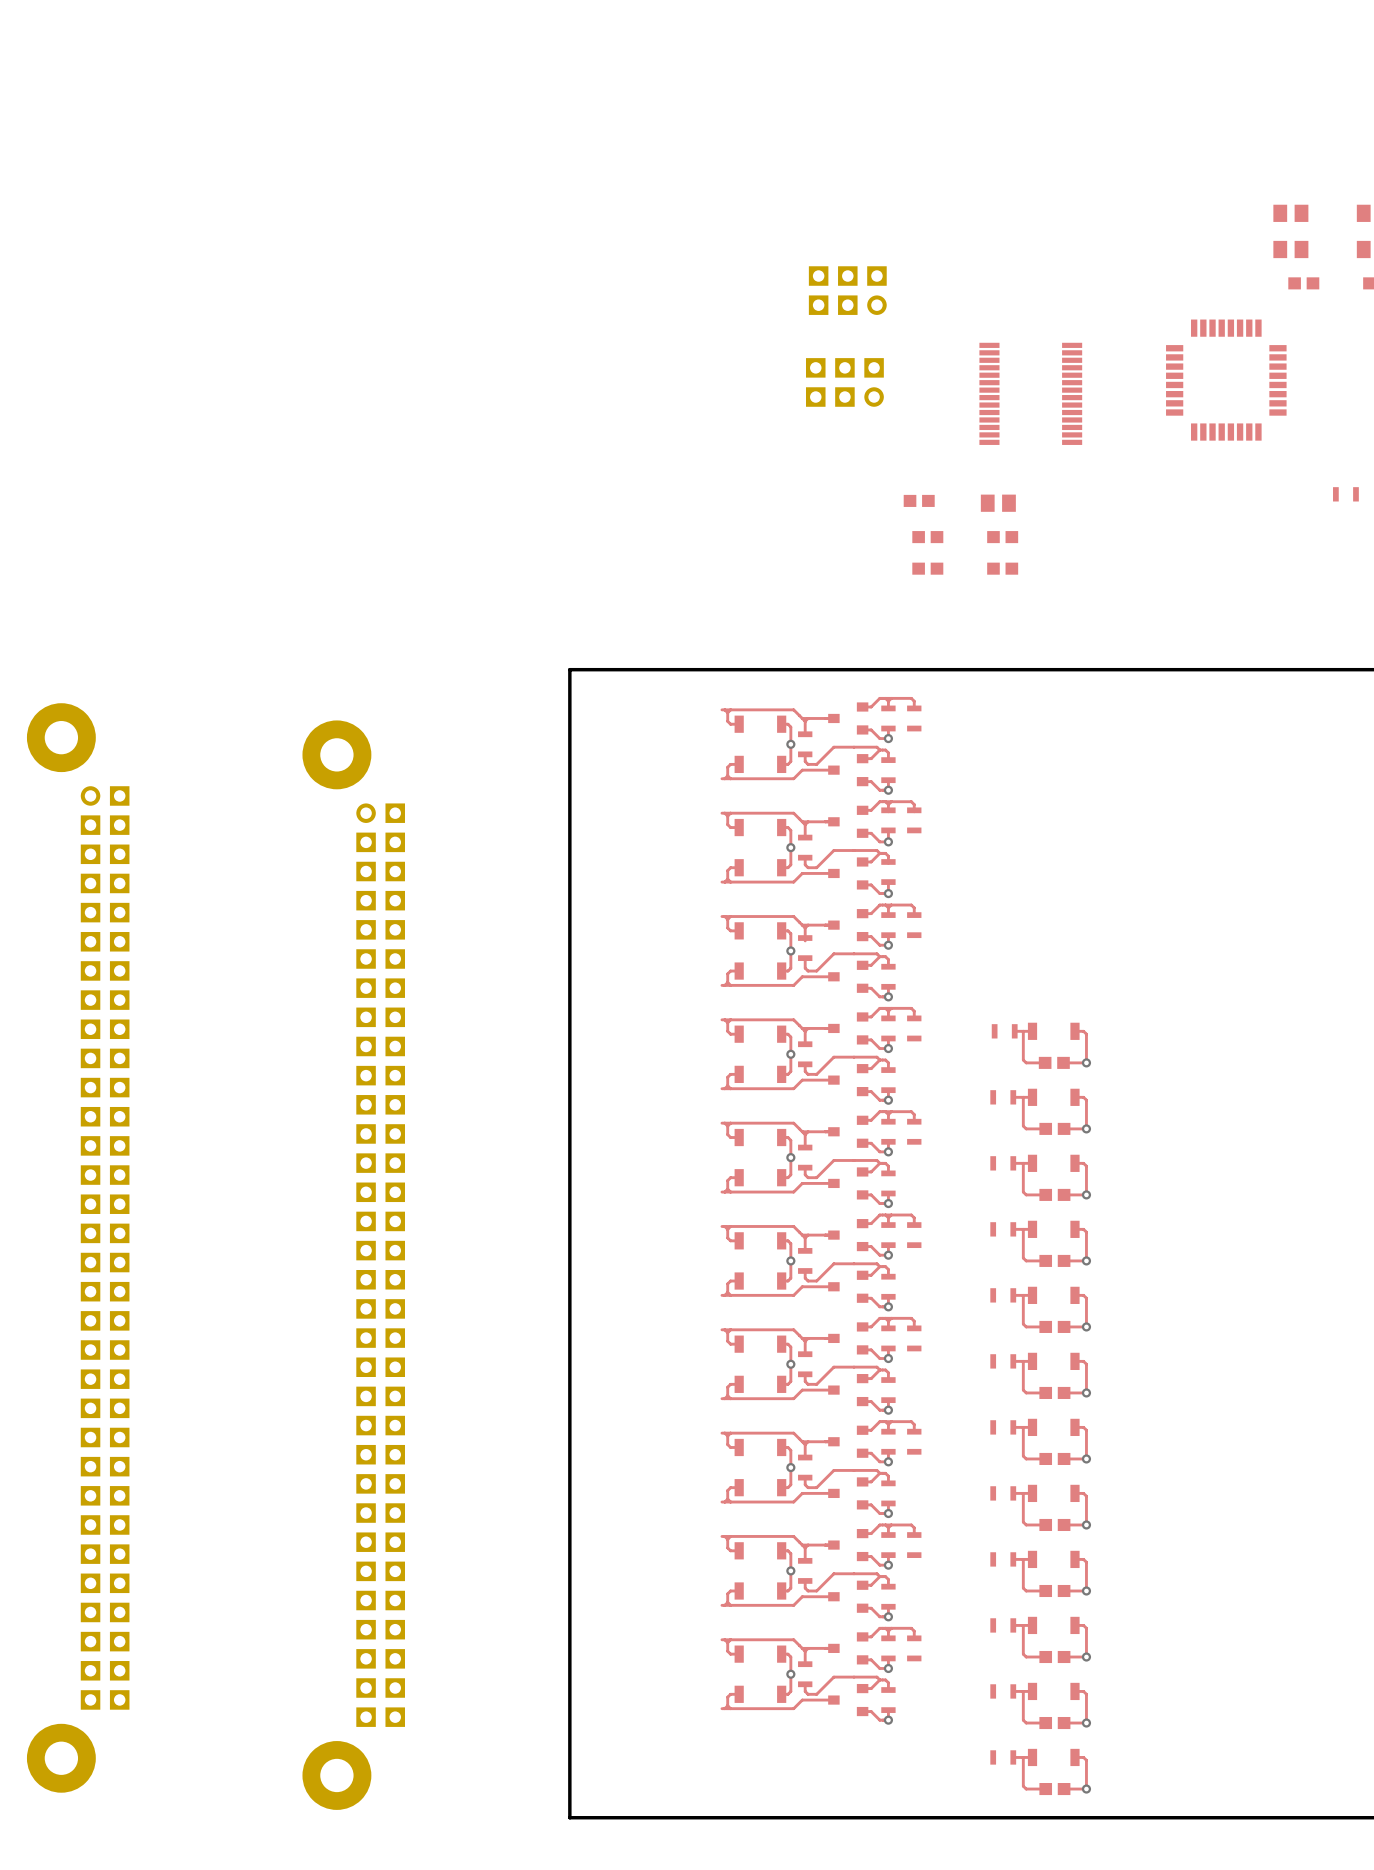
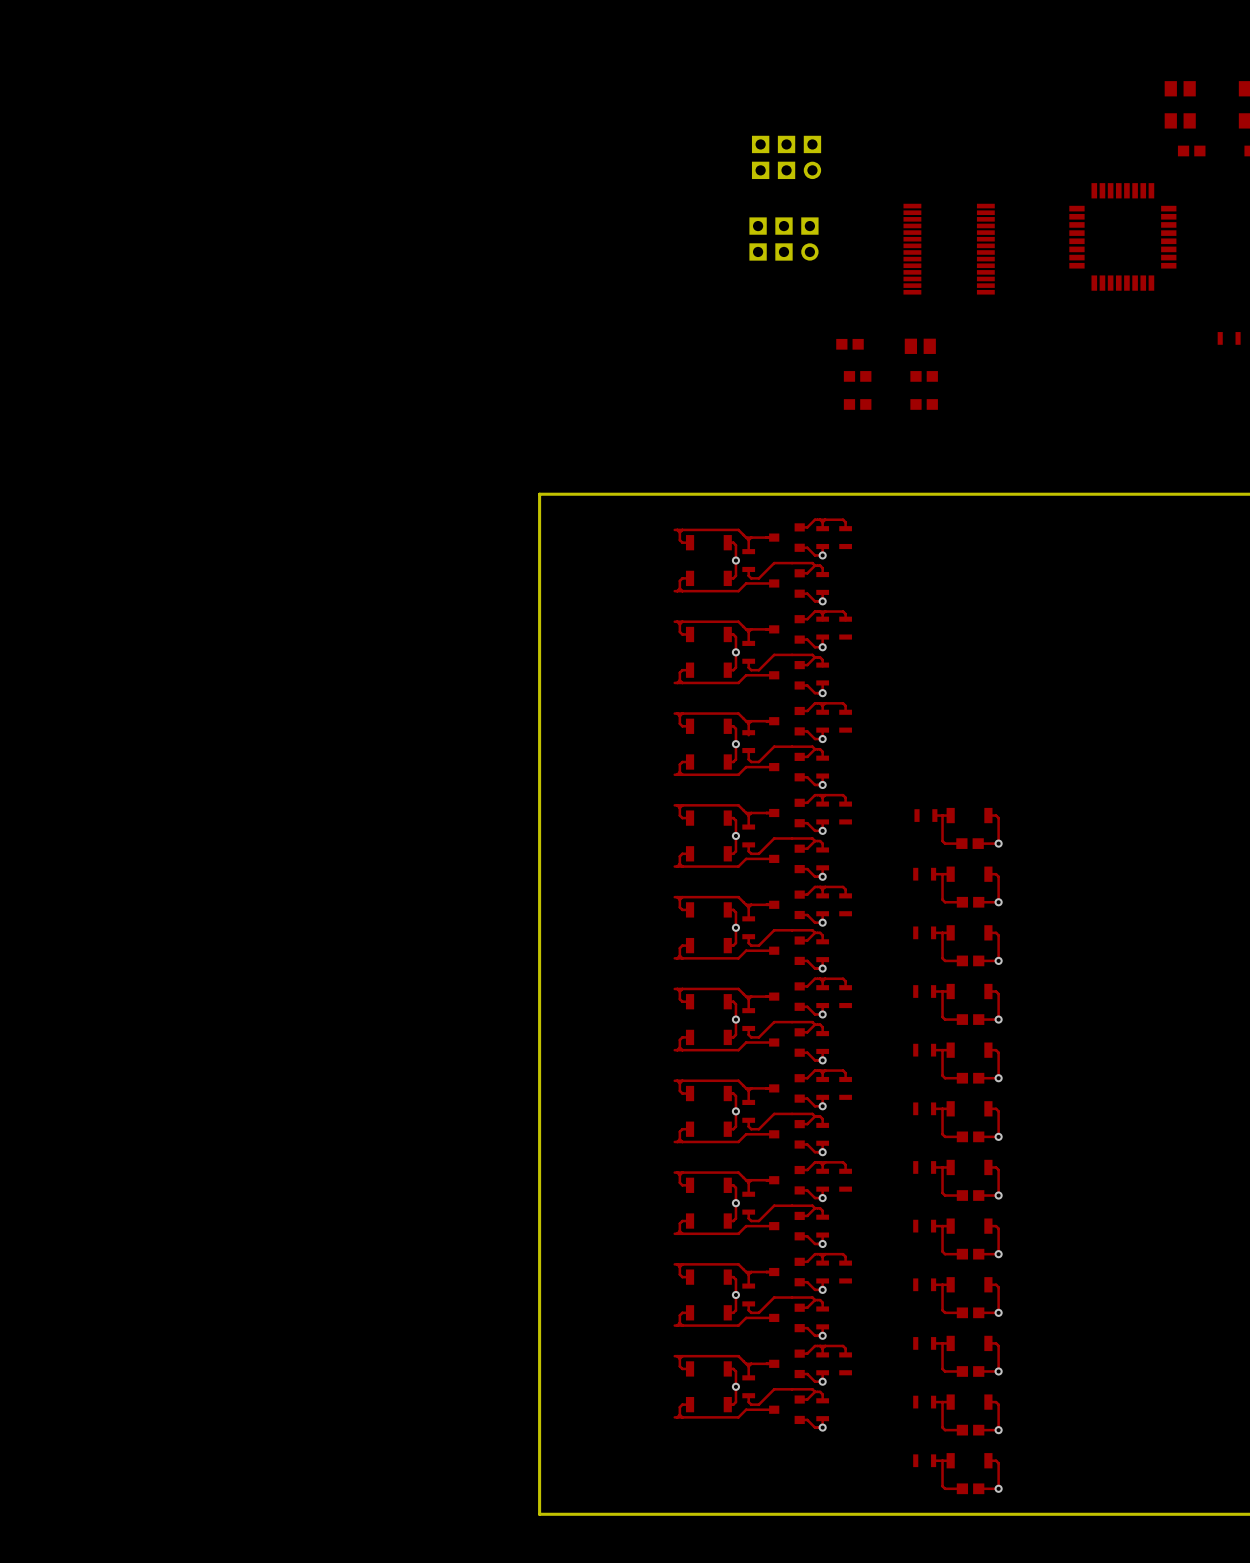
part: (78, 1247) -> none
part: (353, 1265) -> none

